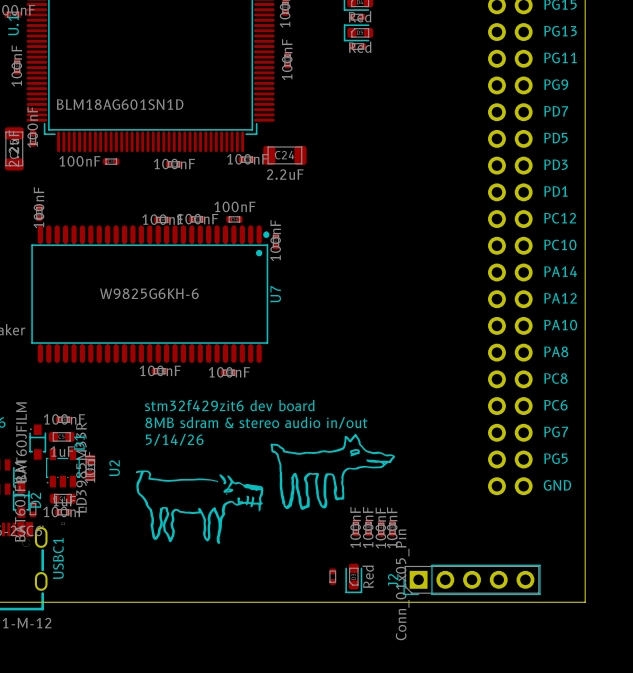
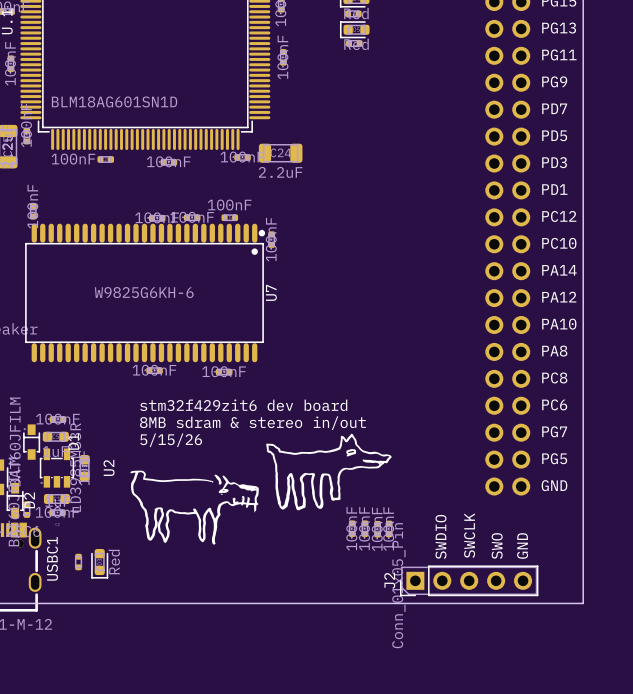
text: 8MB sdram & stereo audio in/out (256, 422) -> 8MB sdram & stereo in/out (252, 423)
text: 5/14/26 (174, 439) -> 5/15/26 (171, 440)
text: none -> SWCLK (469, 535)
text: none -> SWDIO (440, 536)
text: none -> SWO (497, 546)
text: none -> GND (522, 545)
part position: (332, 576) -> (78, 562)
part position: (353, 578) -> (99, 563)

